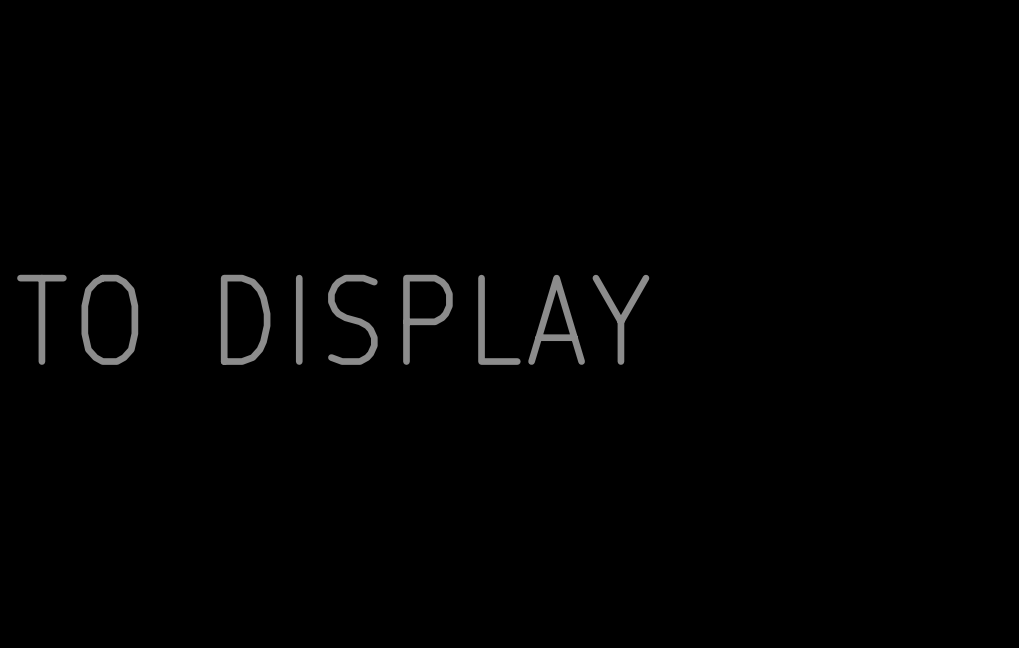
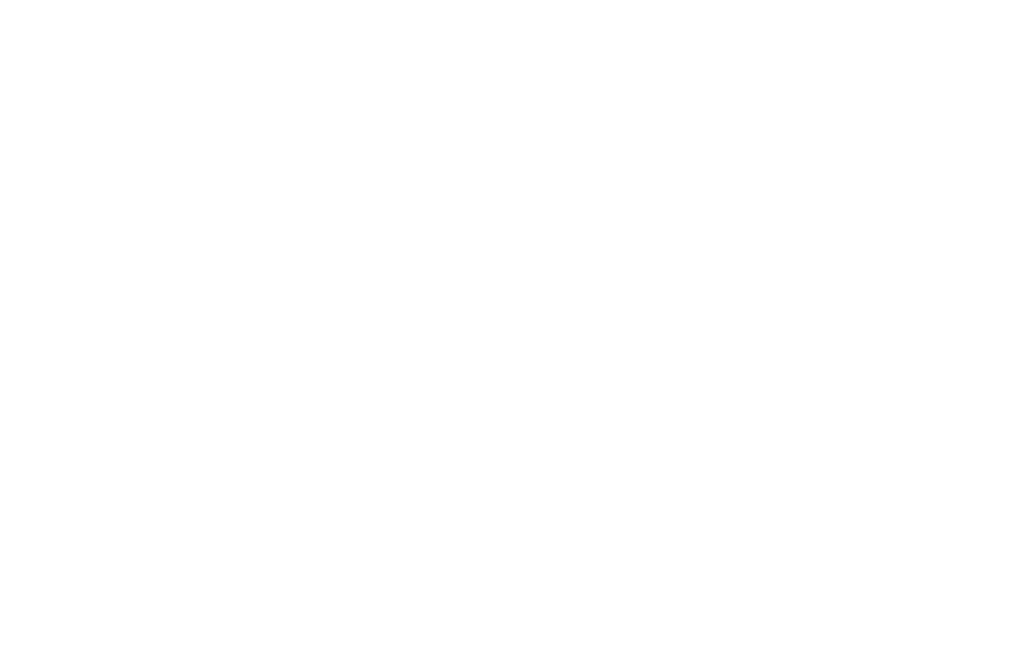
text: TO DISPLAY (333, 319) -> none

